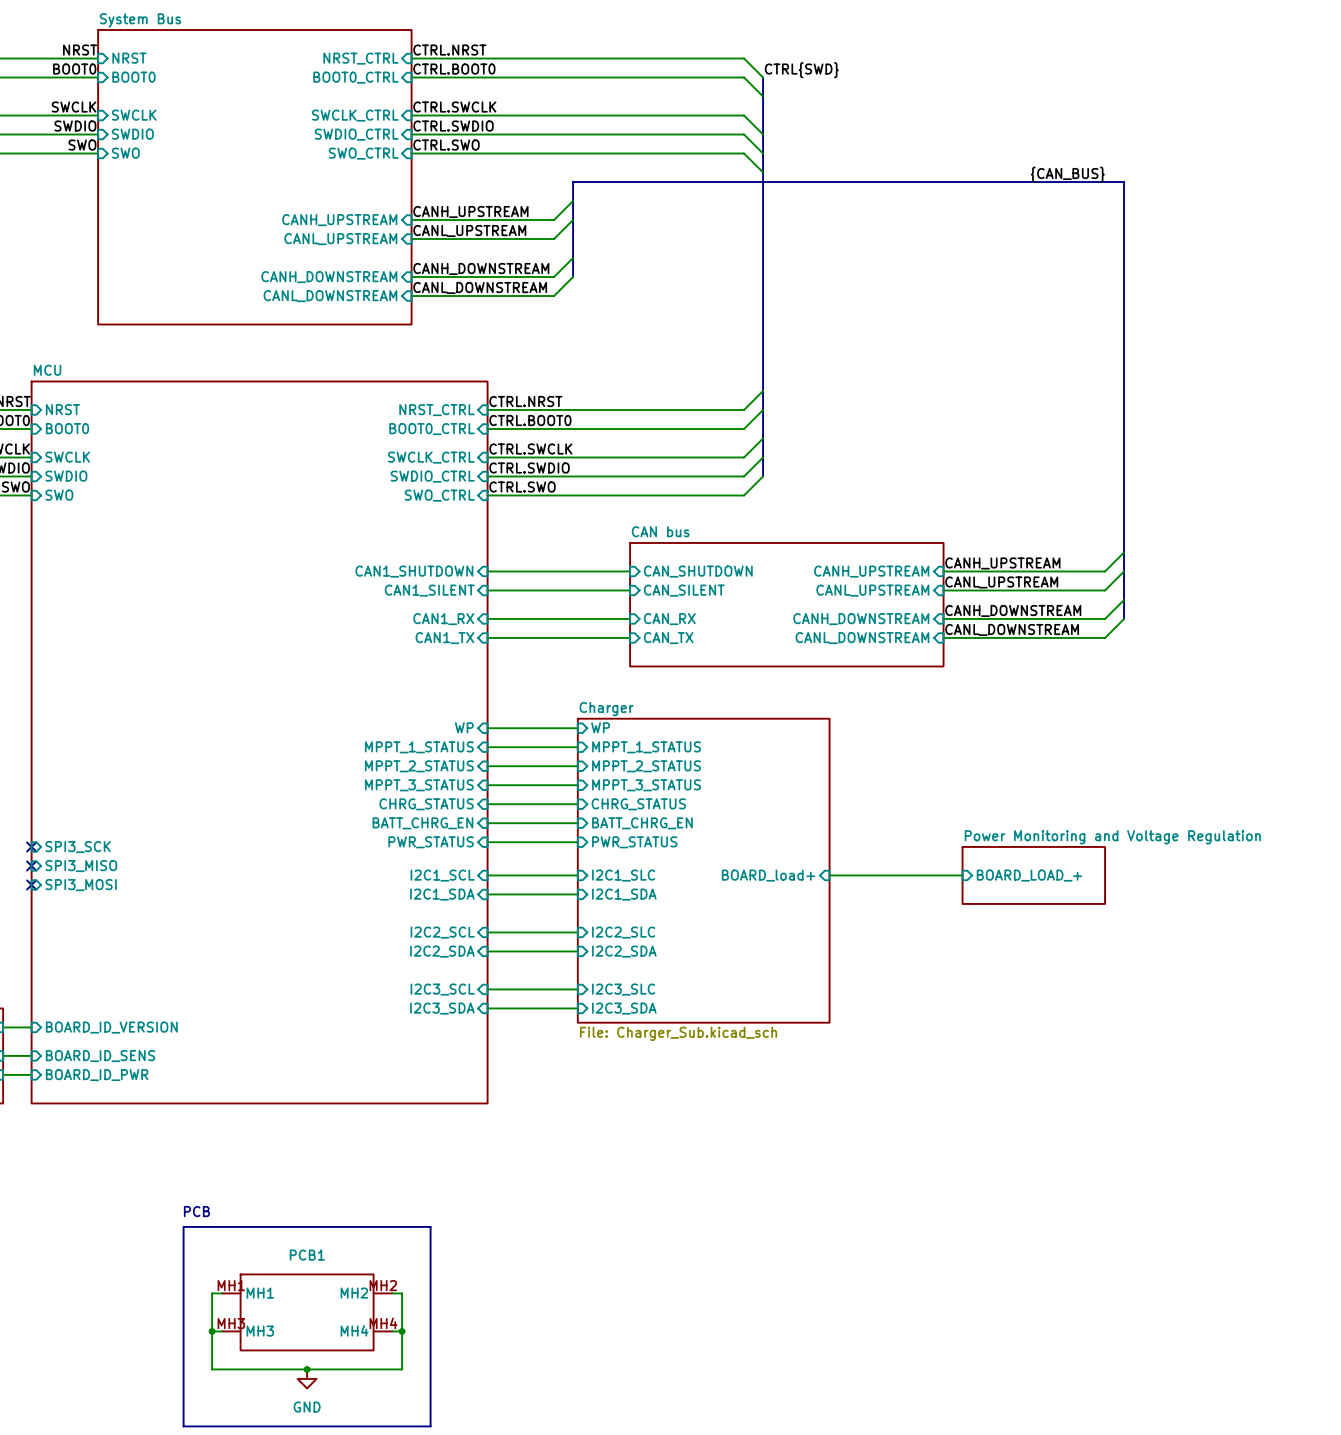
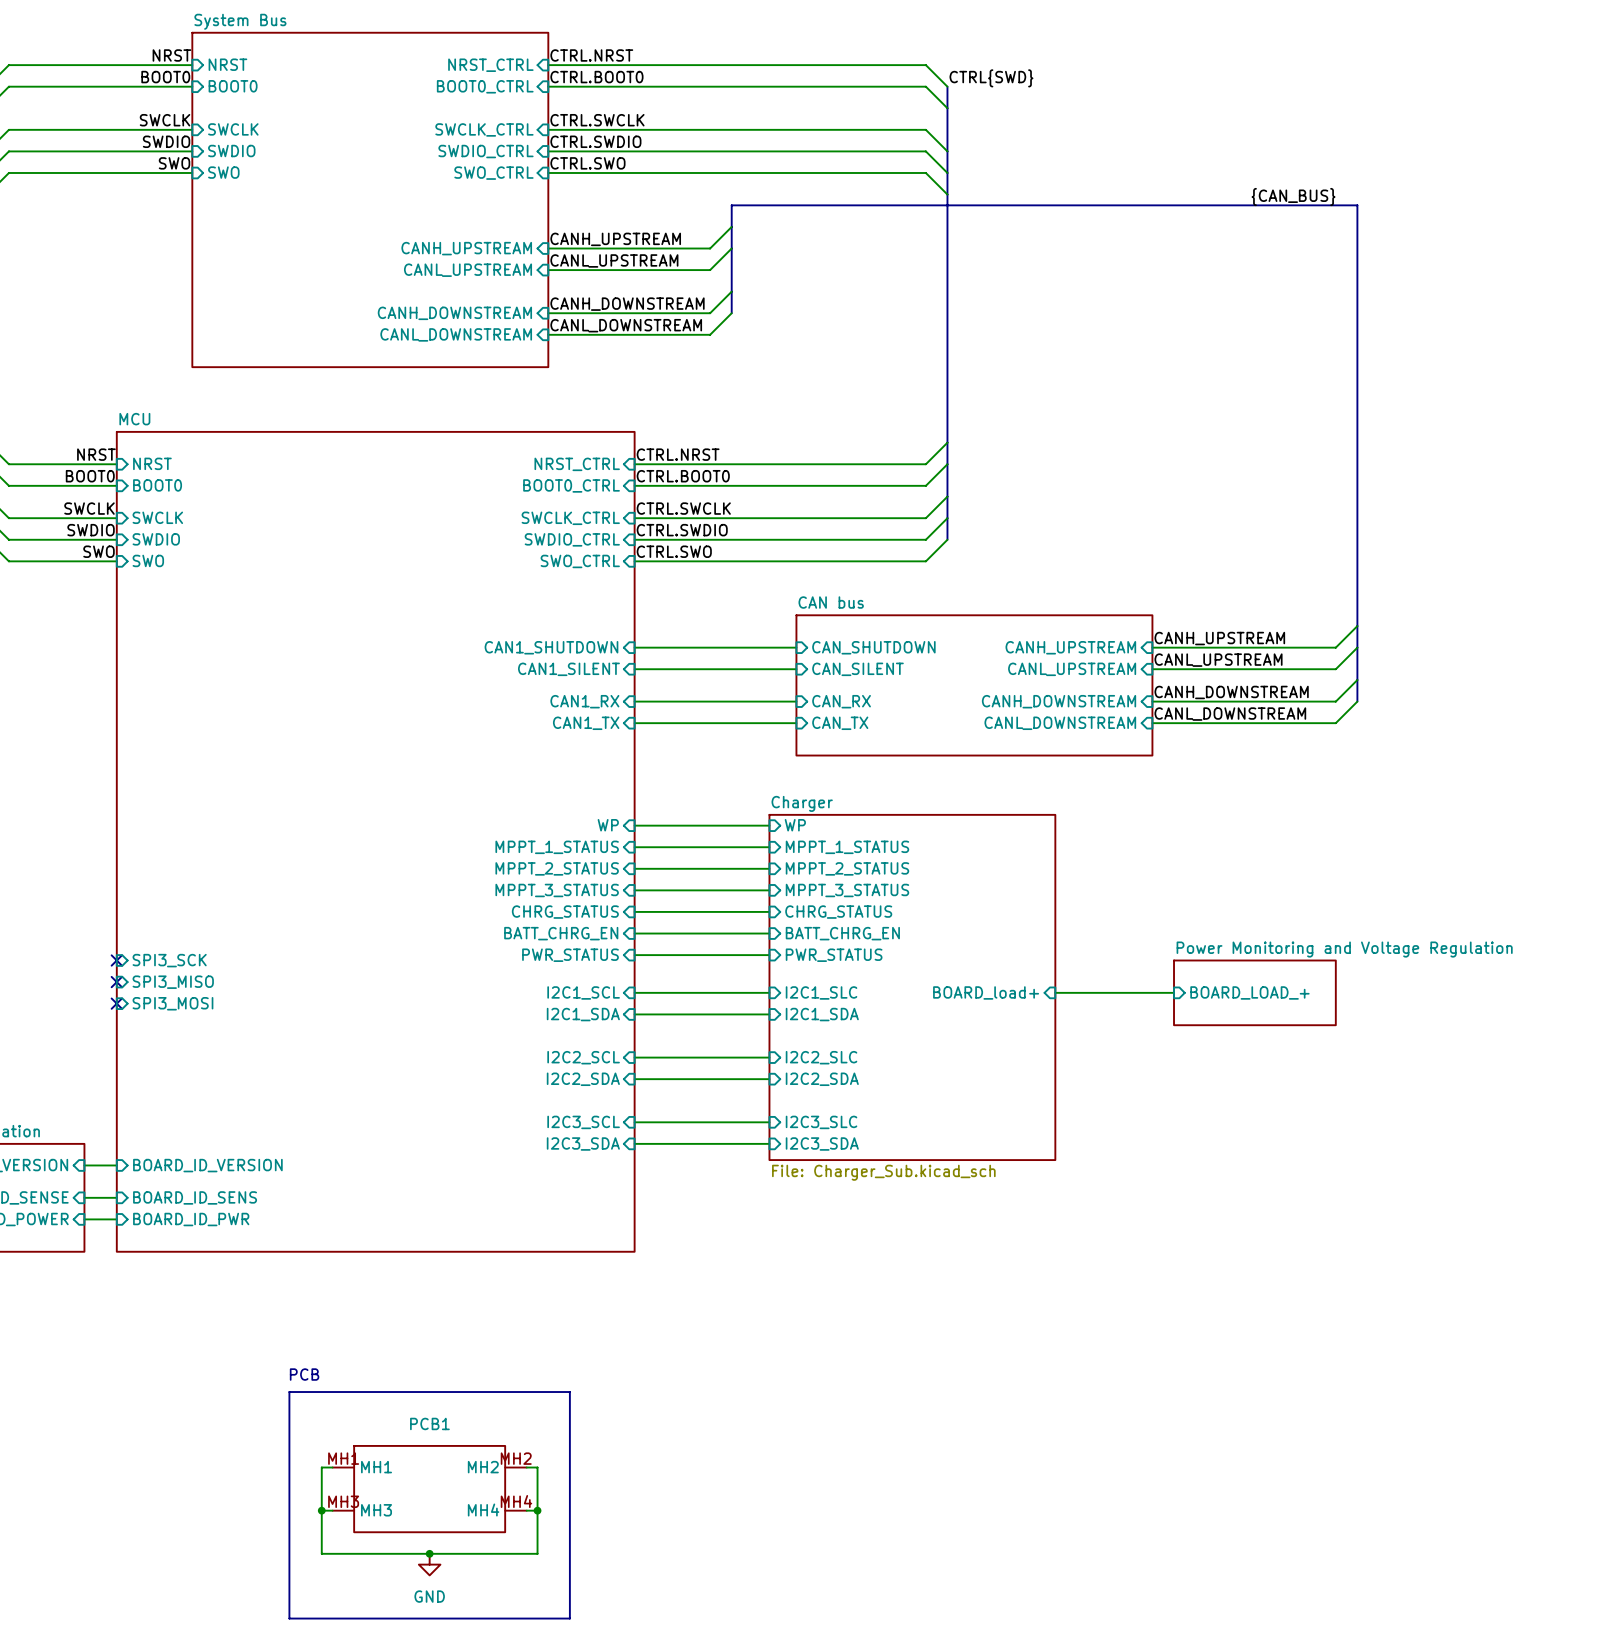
sheet pin position: WP (600, 727) -> WP (795, 825)
wire: none -> (737, 825) (769, 825)
wire: none -> (737, 847) (769, 847)
sheet pin position: MPPT_1_STATUS (646, 747) -> MPPT_1_STATUS (847, 847)
wire: none -> (737, 868) (769, 868)
sheet pin position: MPPT_2_STATUS (646, 766) -> MPPT_2_STATUS (847, 868)
wire: none -> (737, 890) (769, 890)
sheet pin position: MPPT_3_STATUS (646, 785) -> MPPT_3_STATUS (847, 890)
wire: none -> (737, 911) (769, 911)
sheet pin position: CHRG_STATUS (638, 804) -> CHRG_STATUS (838, 912)
wire: none -> (737, 933) (769, 933)
sheet pin position: BATT_CHRG_EN (642, 823) -> BATT_CHRG_EN (842, 933)
wire: none -> (737, 955) (769, 955)
sheet pin position: PWR_STATUS (634, 842) -> PWR_STATUS (834, 955)
sheet Charger position: (703, 870) -> (912, 987)
wire: none -> (737, 992) (769, 992)
sheet pin position: I2C1_SLC (623, 875) -> I2C1_SLC (821, 992)
sheet pin position: BOARD_load+ (768, 875) -> BOARD_load+ (986, 992)
wire: (829, 875) (858, 875) -> none
wire: none -> (737, 1014) (769, 1014)
sheet pin position: I2C1_SDA (624, 894) -> I2C1_SDA (822, 1014)
wire: none -> (737, 1057) (769, 1057)
sheet pin position: I2C2_SLC (623, 932) -> I2C2_SLC (821, 1057)
wire: none -> (737, 1079) (769, 1079)
sheet pin position: I2C2_SDA (624, 951) -> I2C2_SDA (822, 1079)
wire: none -> (737, 1122) (769, 1122)
sheet pin position: I2C3_SLC (623, 989) -> I2C3_SLC (821, 1122)
wire: none -> (737, 1143) (769, 1143)
sheet pin position: I2C3_SDA (624, 1008) -> I2C3_SDA (822, 1144)

